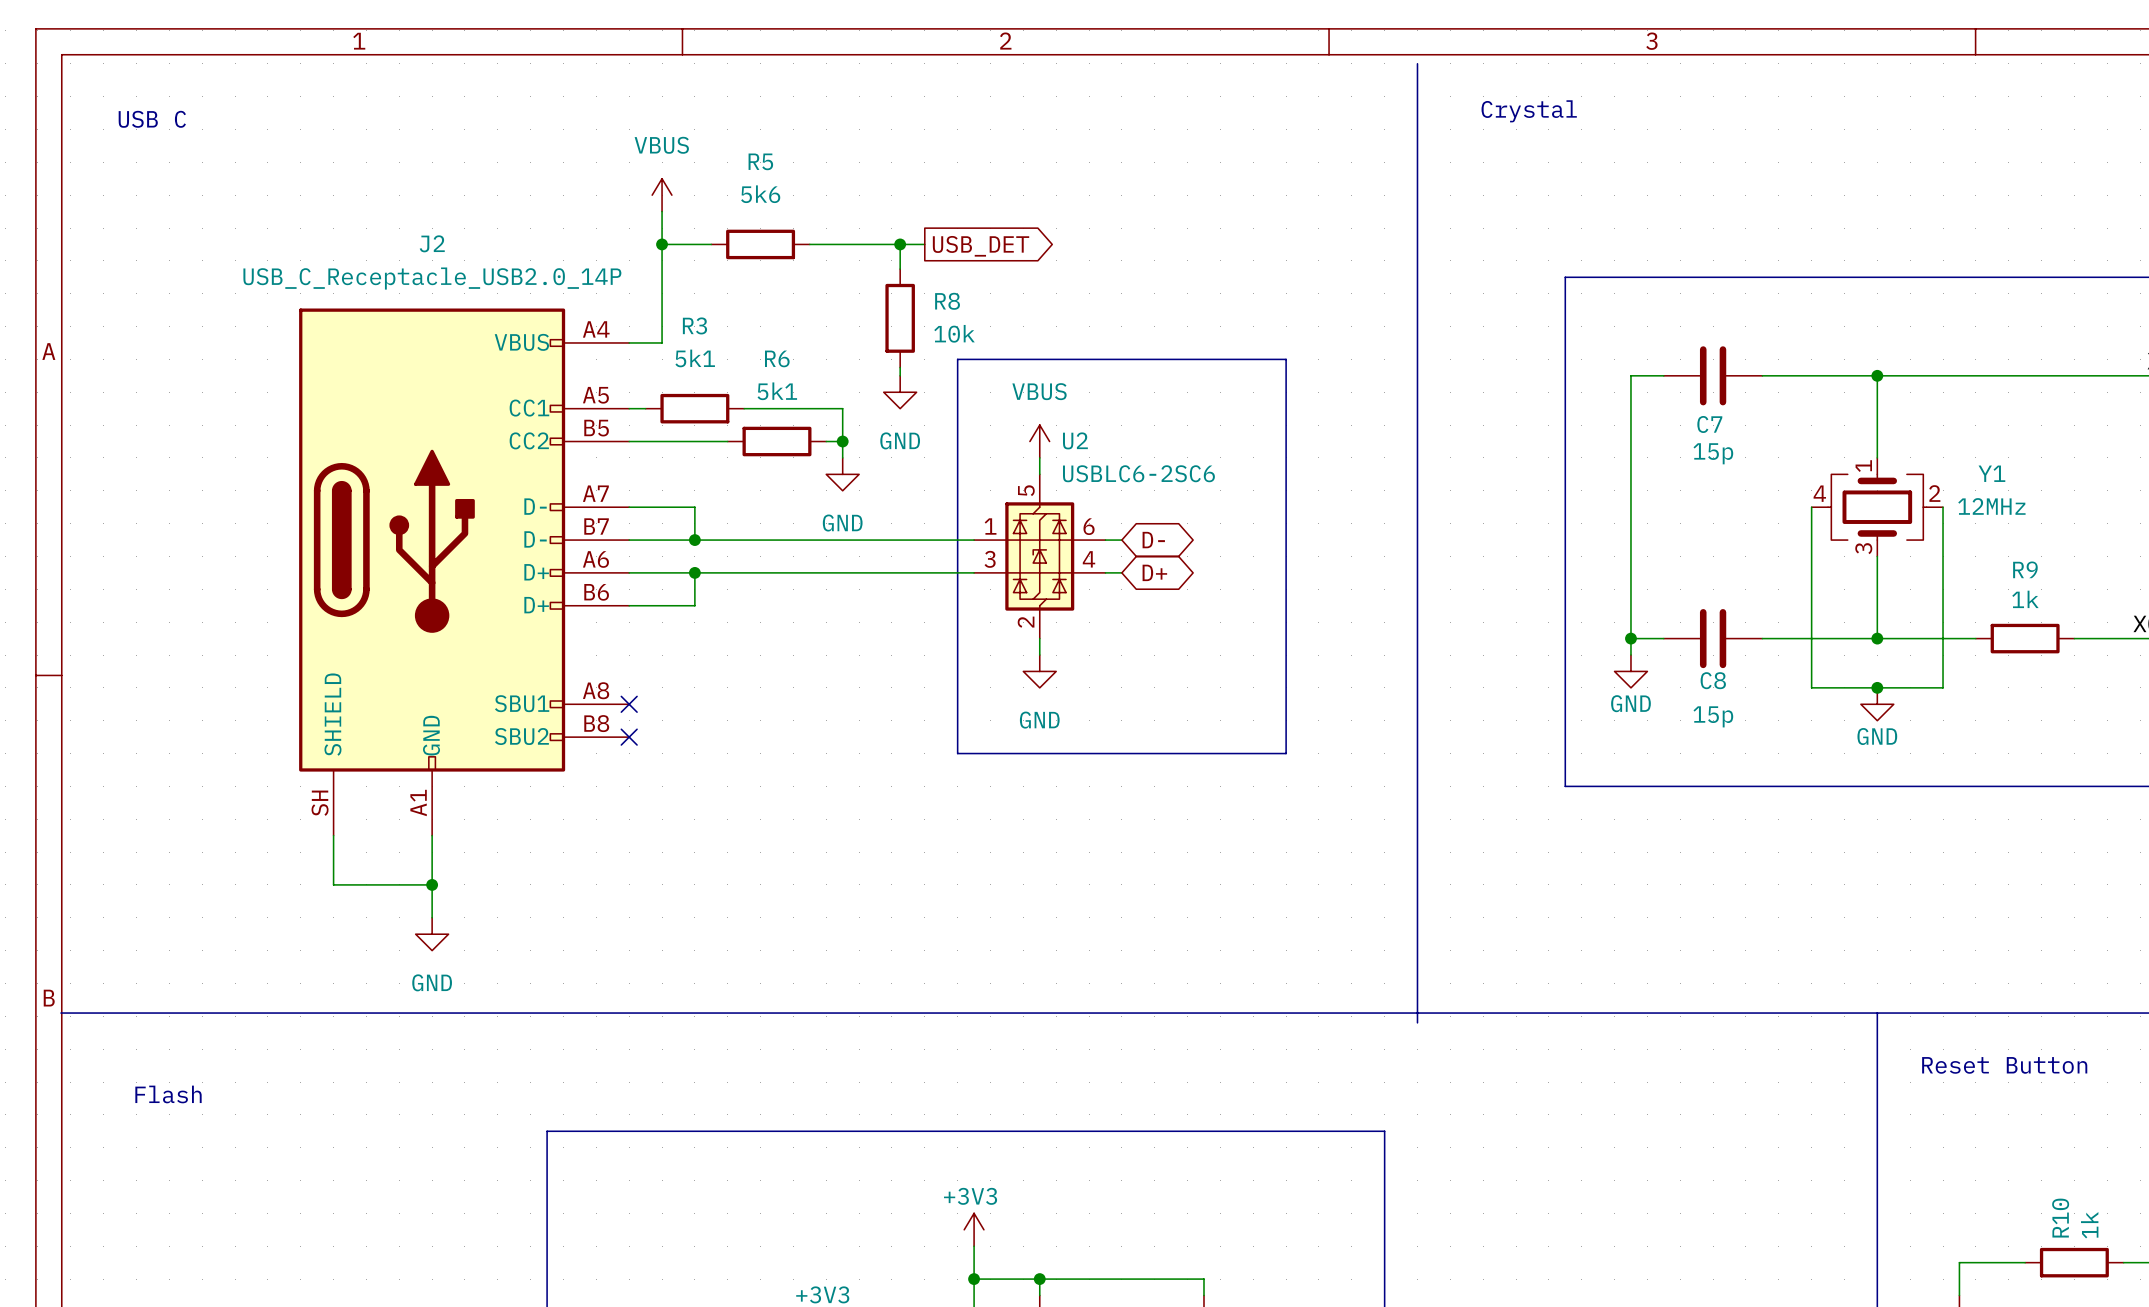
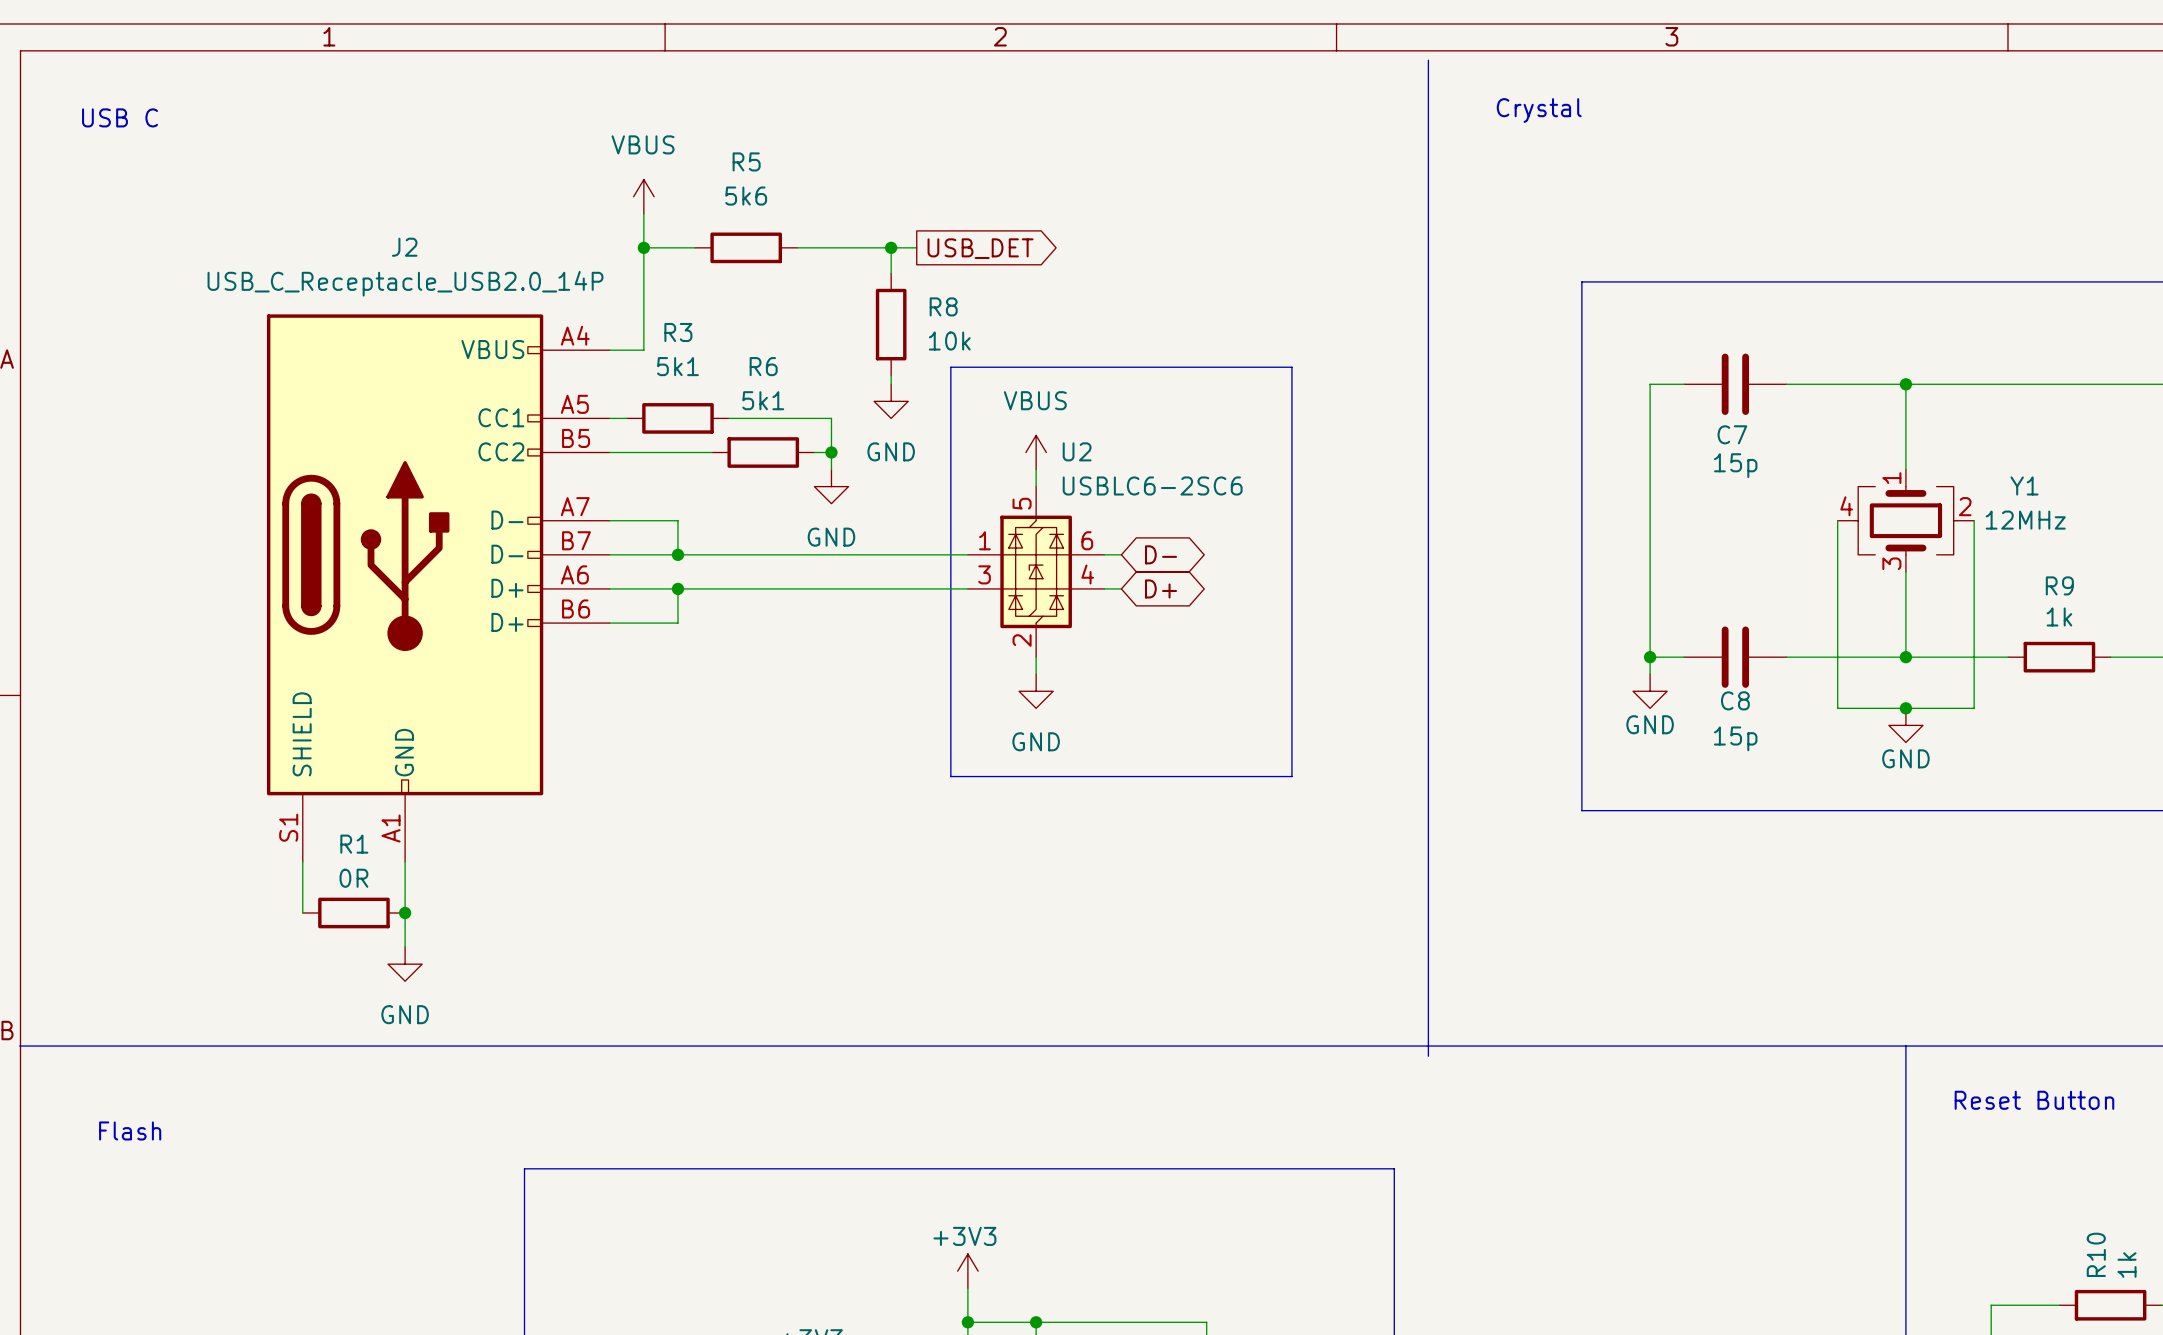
J2 symbol: [299, 308, 630, 836] -> [266, 314, 610, 862]
no-connect mark: (629, 704) -> none
no-connect mark: (629, 737) -> none
wire: (333, 884) (432, 884) -> none
R1: none -> 0R (353, 912)

